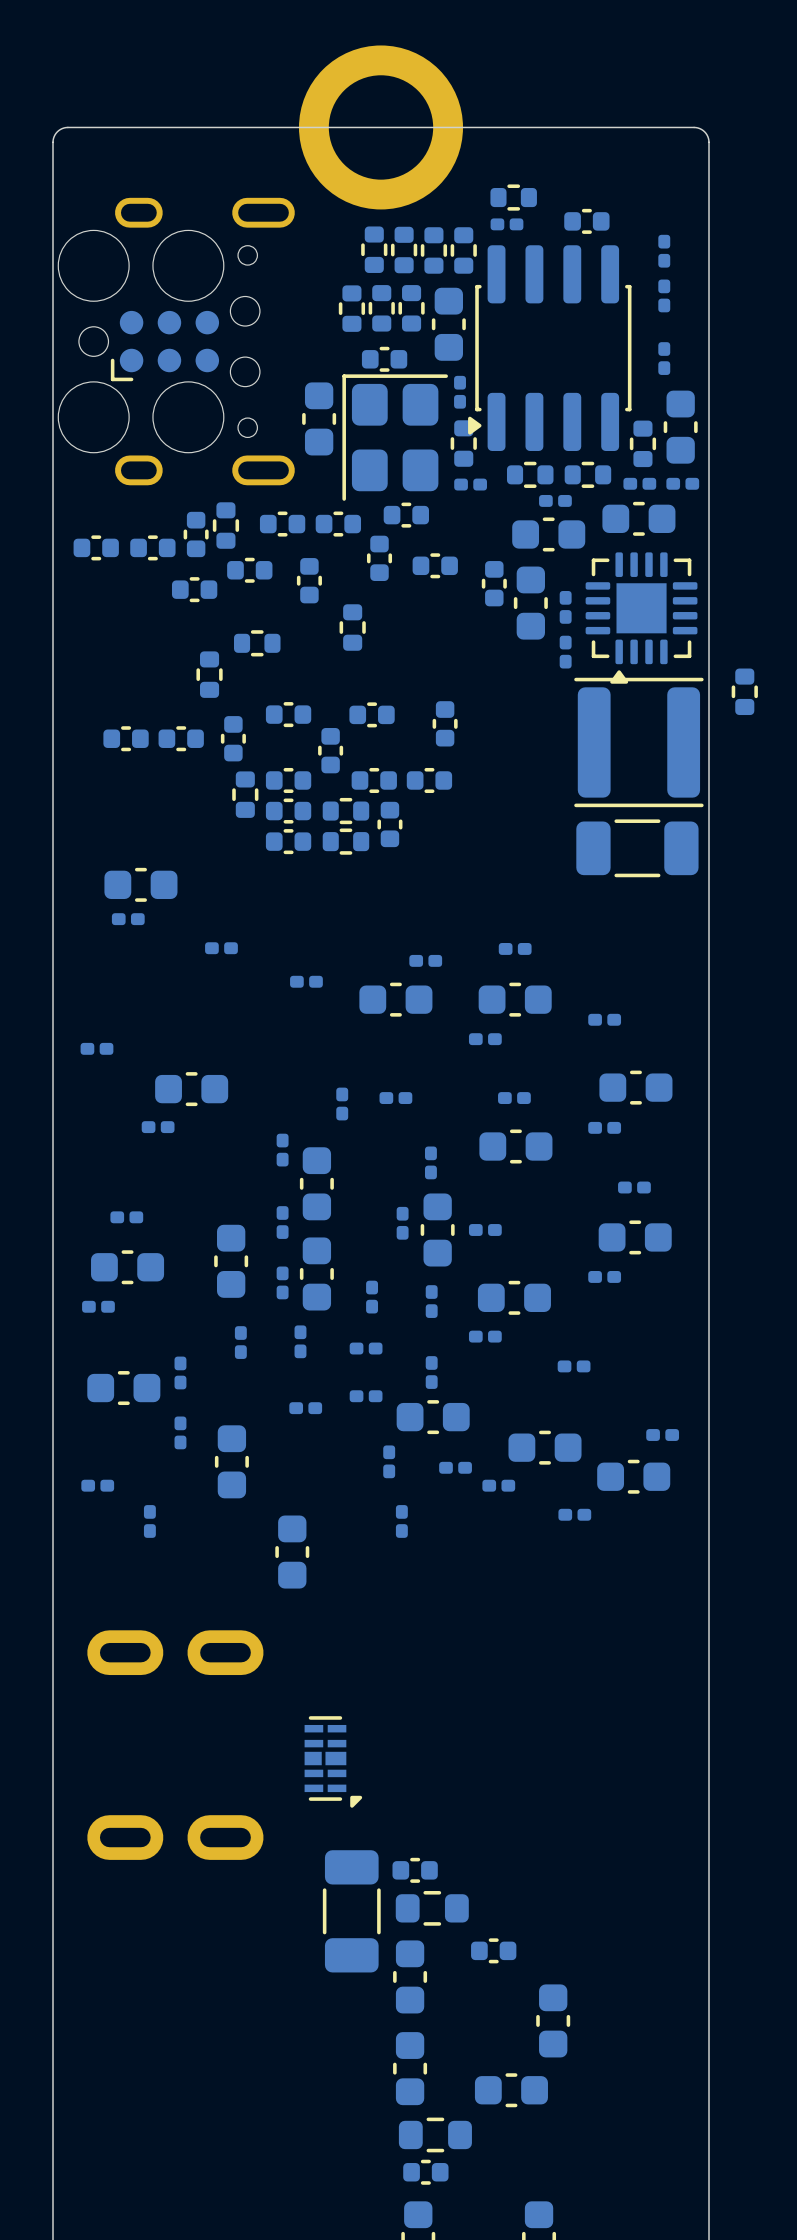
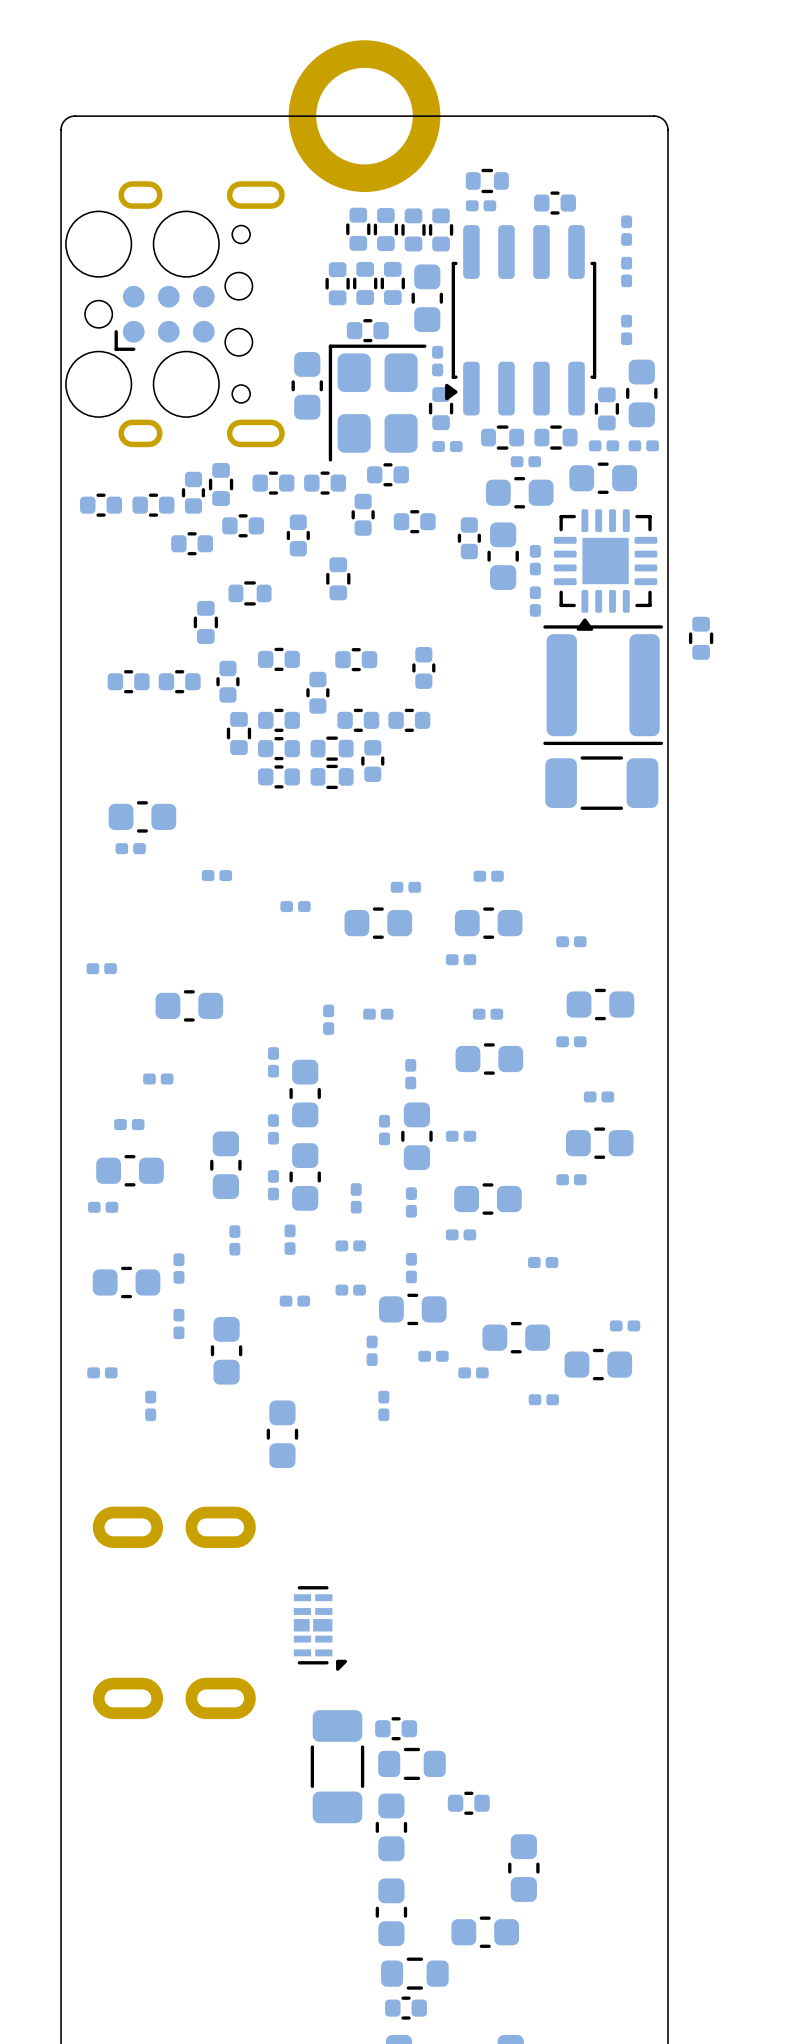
part position: (158, 1127) -> (158, 1079)

